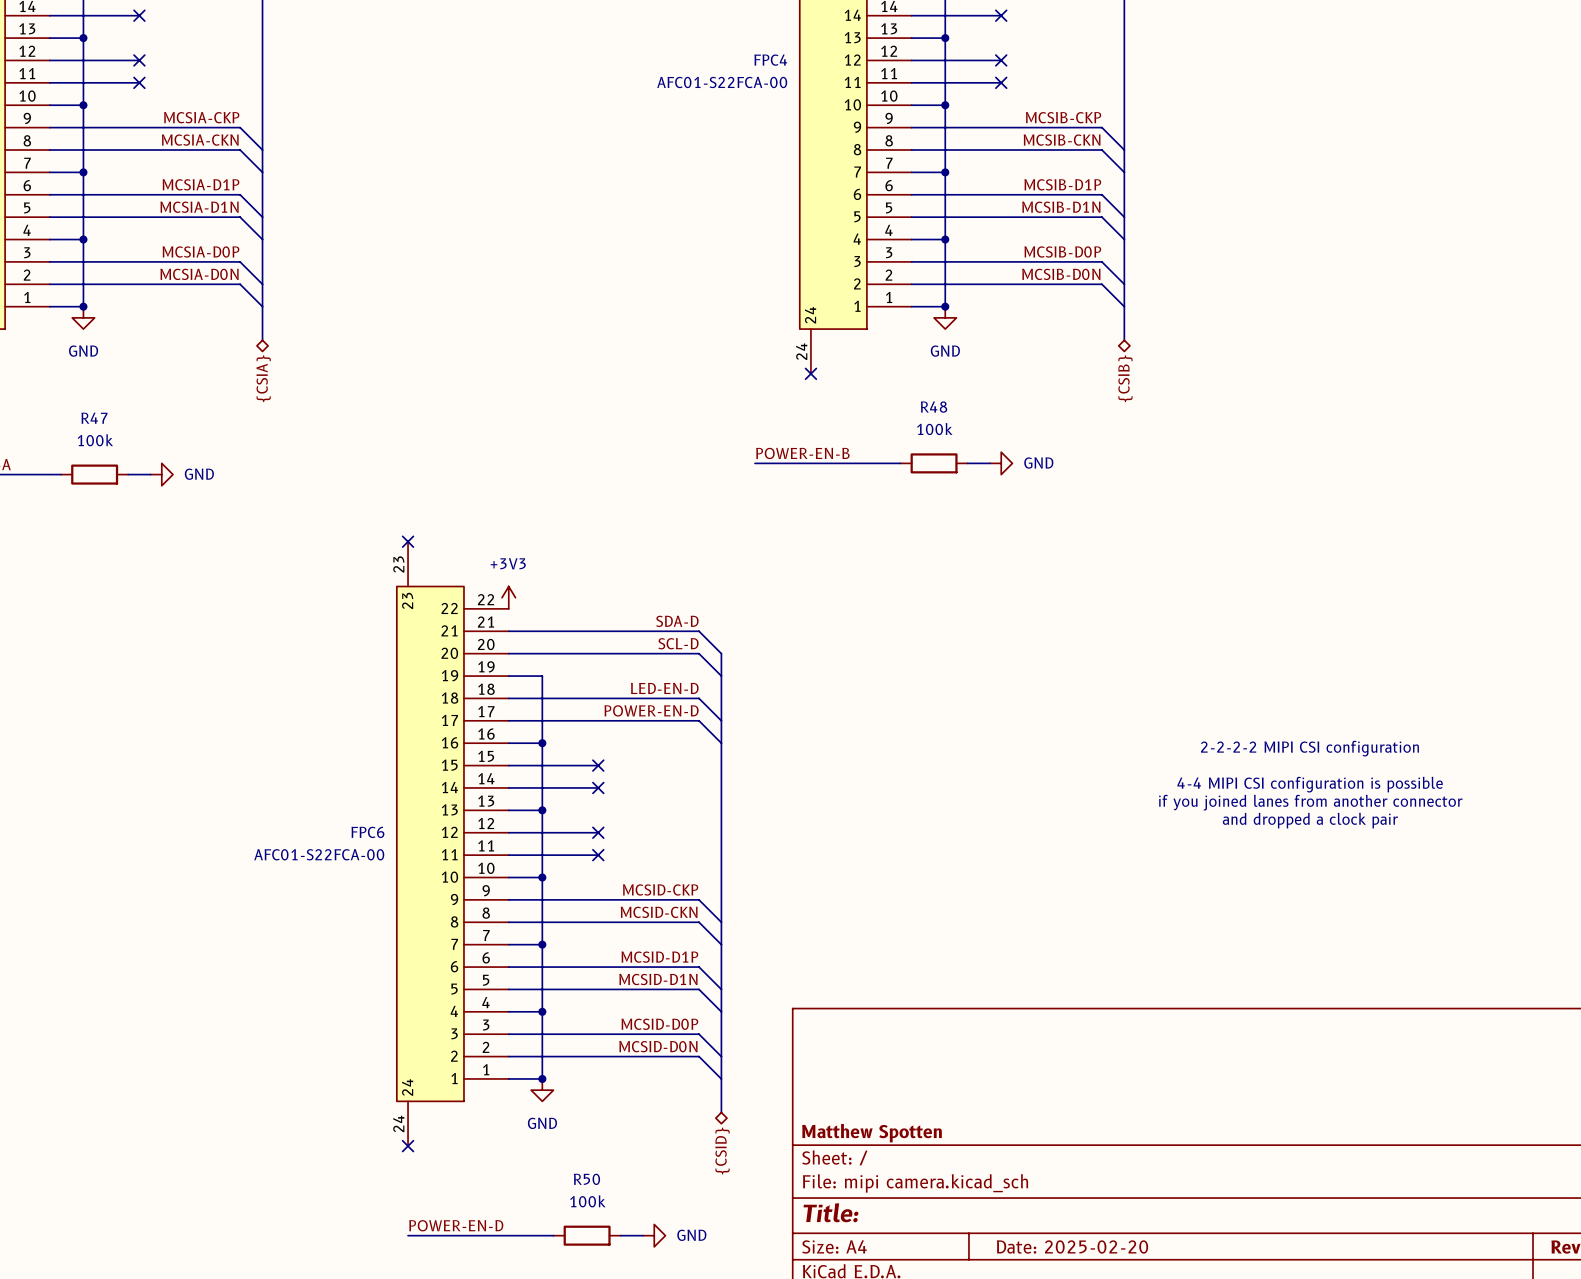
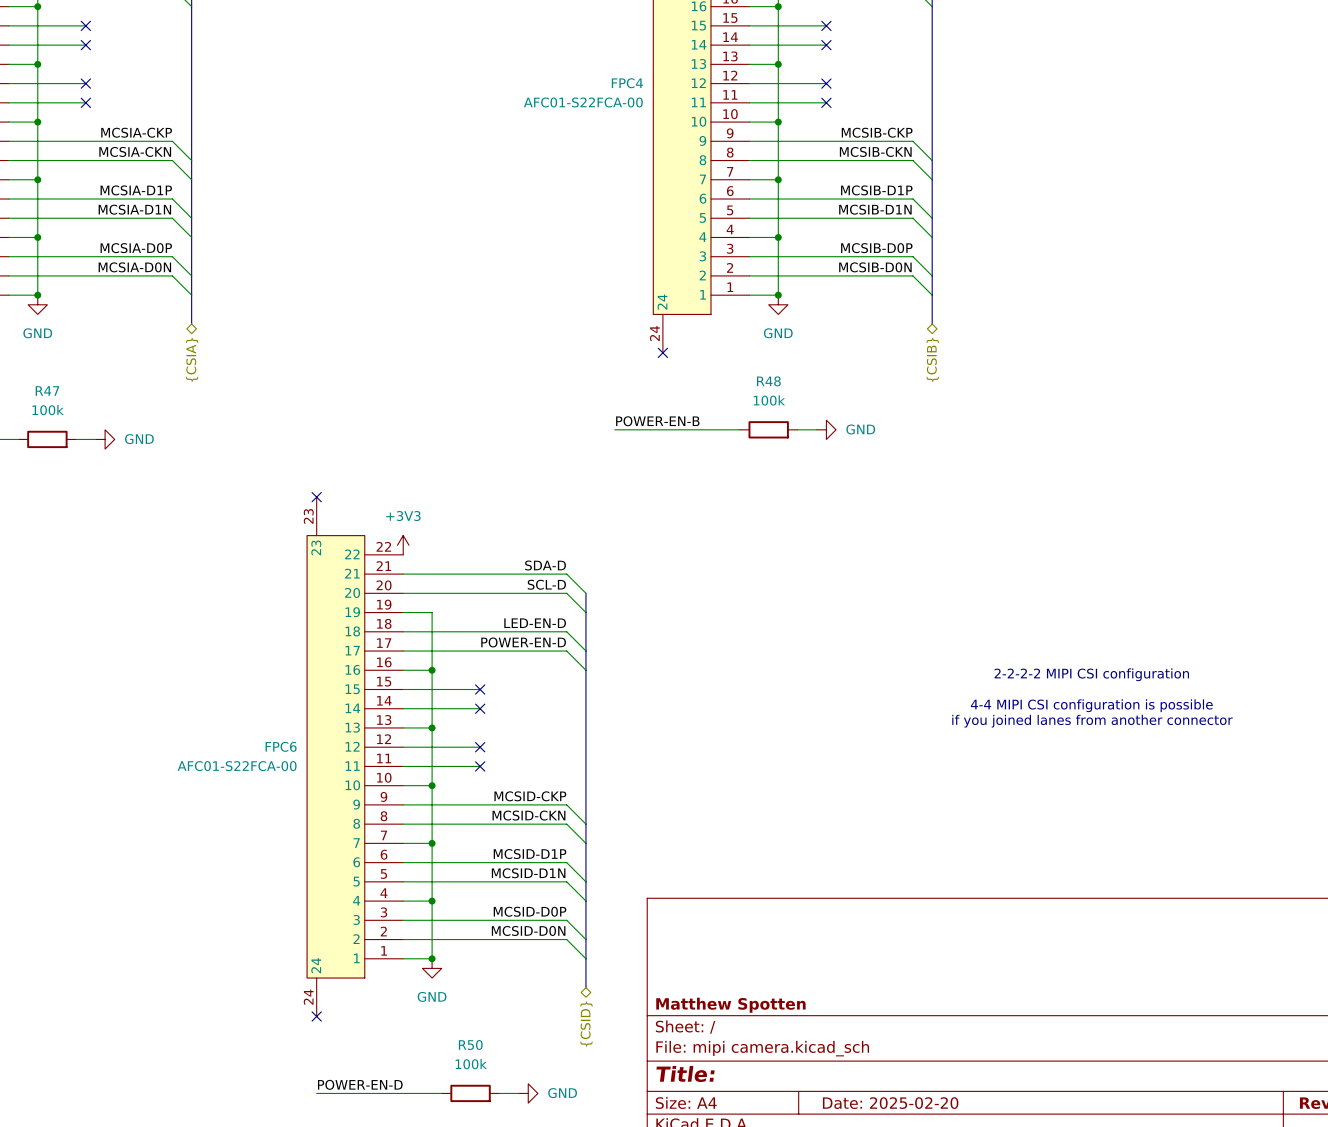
text: and dropped a clock pair (1310, 820) -> none

